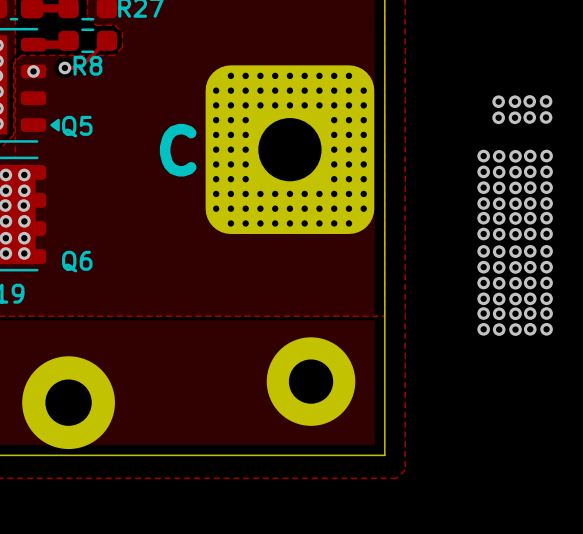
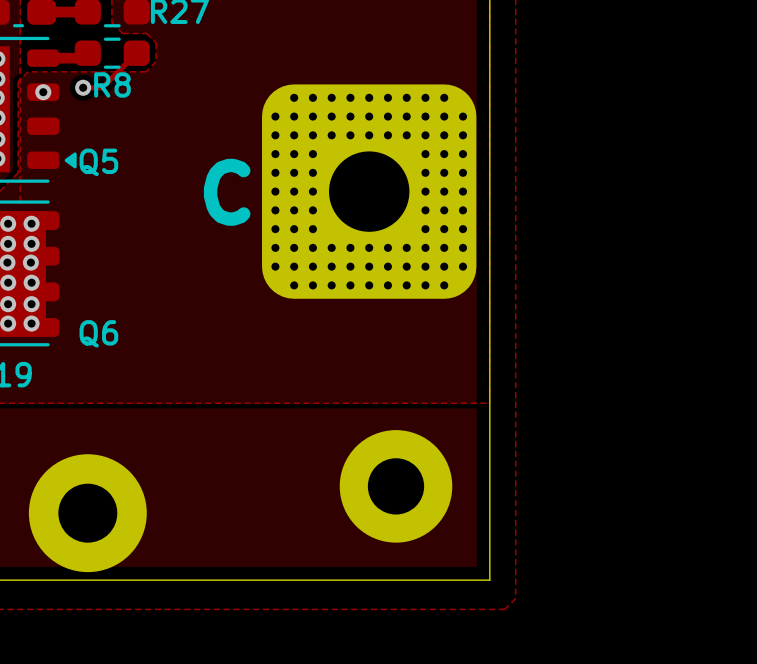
via: (498, 101) -> none
via: (514, 101) -> none
via: (529, 101) -> none
via: (546, 101) -> none
via: (498, 117) -> none
via: (514, 117) -> none
via: (529, 117) -> none
via: (546, 117) -> none
via: (483, 156) -> none
via: (499, 156) -> none
via: (515, 156) -> none
via: (530, 156) -> none
via: (546, 156) -> none
via: (483, 171) -> none
via: (530, 171) -> none
via: (546, 171) -> none
via: (499, 172) -> none
via: (515, 172) -> none
via: (483, 187) -> none
via: (499, 187) -> none
via: (515, 187) -> none
via: (530, 187) -> none
via: (546, 187) -> none
via: (483, 203) -> none
via: (499, 203) -> none
via: (515, 203) -> none
via: (530, 203) -> none
via: (546, 203) -> none
via: (483, 218) -> none
via: (499, 218) -> none
via: (515, 218) -> none
via: (530, 218) -> none
via: (546, 218) -> none
via: (530, 233) -> none
via: (546, 233) -> none
via: (483, 234) -> none
via: (499, 234) -> none
via: (515, 234) -> none
via: (483, 251) -> none
via: (499, 251) -> none
via: (515, 251) -> none
via: (530, 251) -> none
via: (546, 251) -> none
via: (483, 267) -> none
via: (499, 267) -> none
via: (515, 267) -> none
via: (530, 267) -> none
via: (546, 267) -> none
via: (483, 282) -> none
via: (530, 282) -> none
via: (546, 282) -> none
via: (499, 283) -> none
via: (515, 283) -> none
via: (483, 298) -> none
via: (530, 298) -> none
via: (546, 298) -> none
via: (499, 299) -> none
via: (515, 299) -> none
via: (483, 313) -> none
via: (499, 313) -> none
via: (515, 313) -> none
via: (530, 313) -> none
via: (546, 313) -> none
via: (483, 329) -> none
via: (499, 329) -> none
via: (515, 329) -> none
via: (530, 329) -> none
via: (546, 329) -> none

